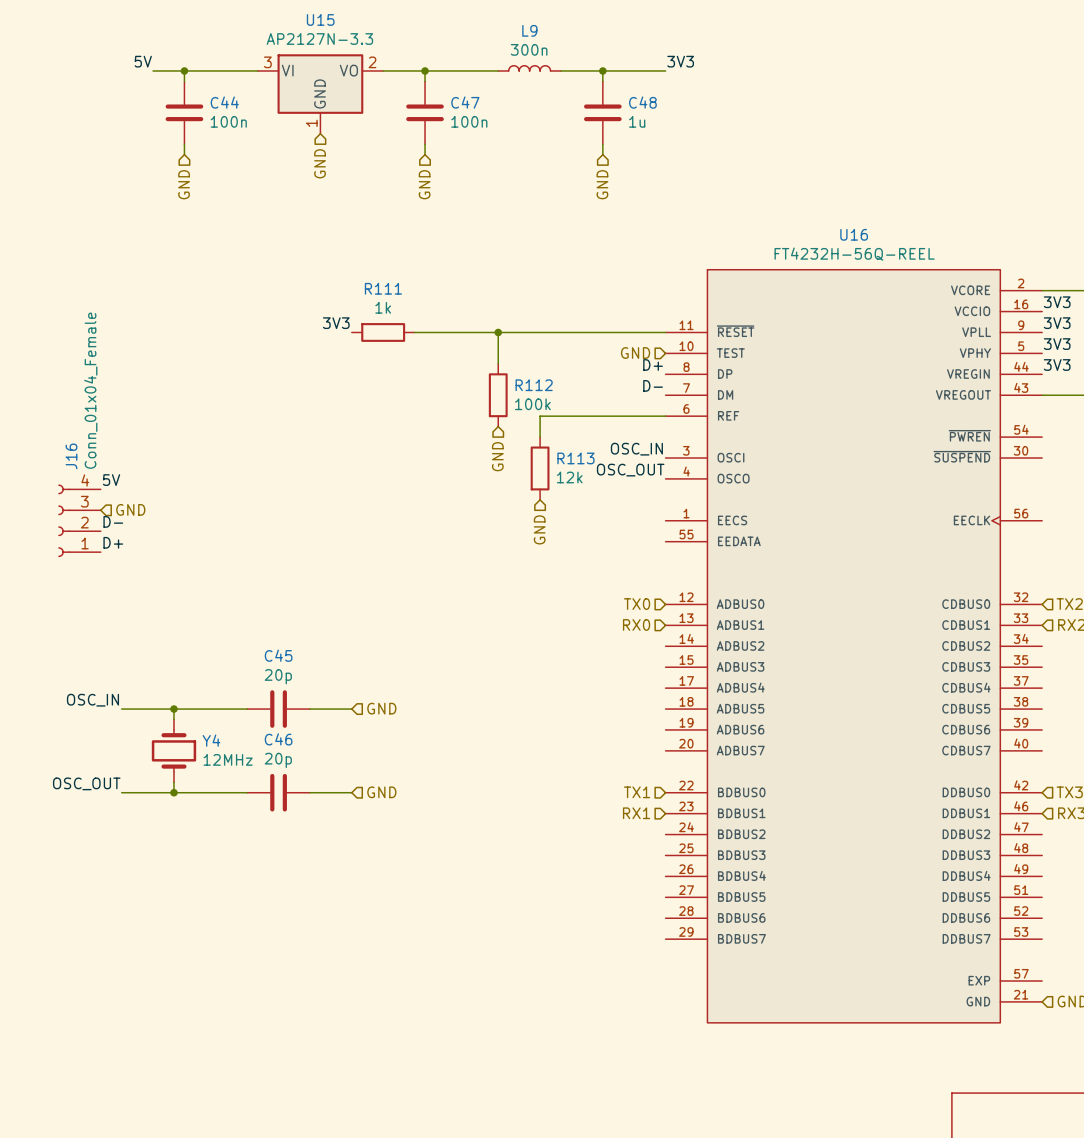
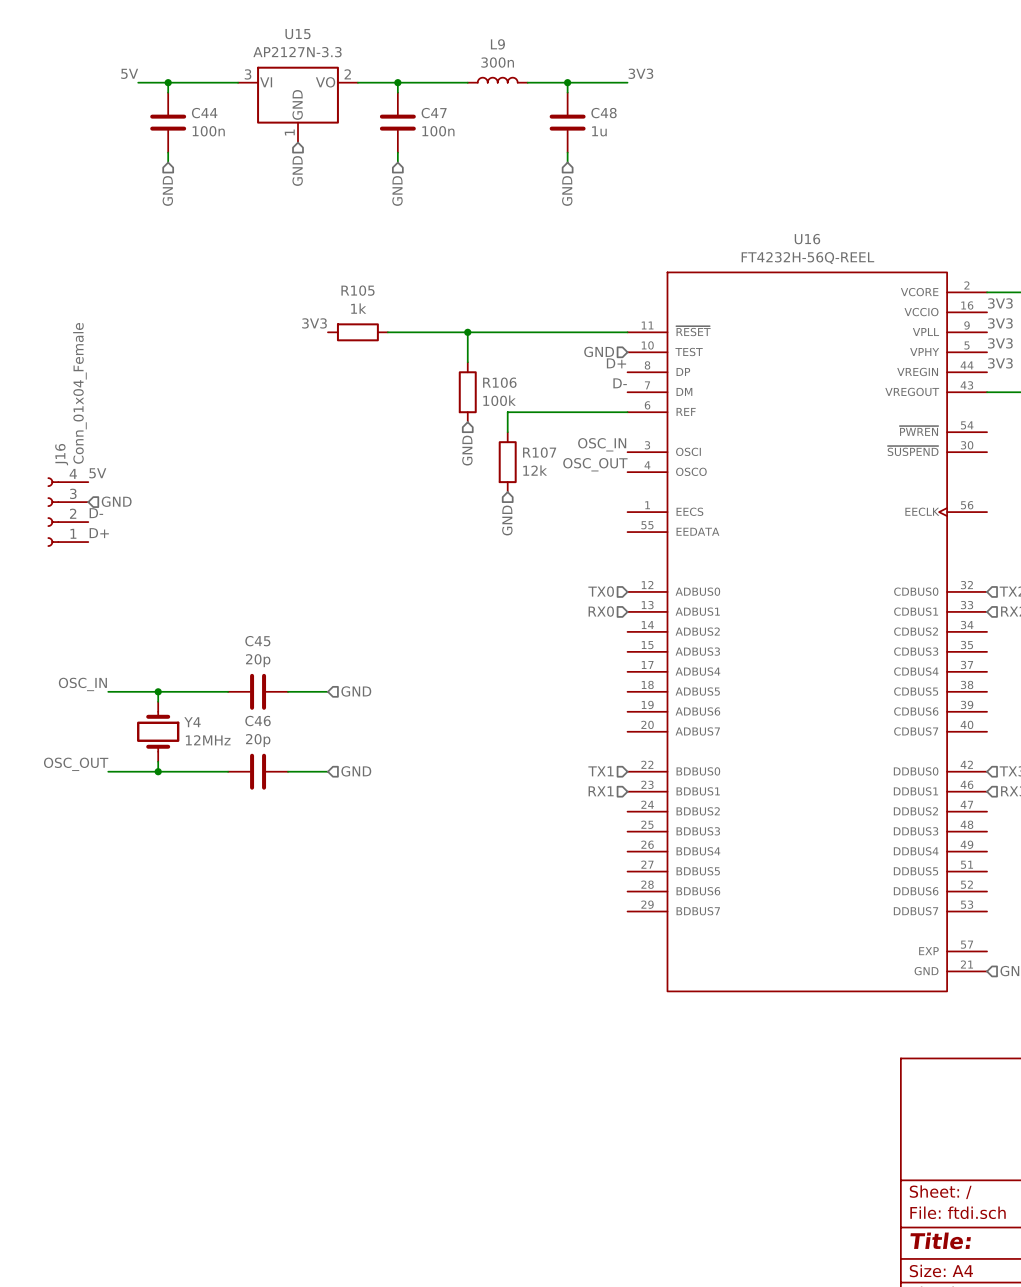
R111 name: R111 (383, 288) -> R105 (357, 290)
R112 name: R112 (534, 385) -> R106 (499, 382)
R113 name: R113 (575, 458) -> R107 (539, 452)

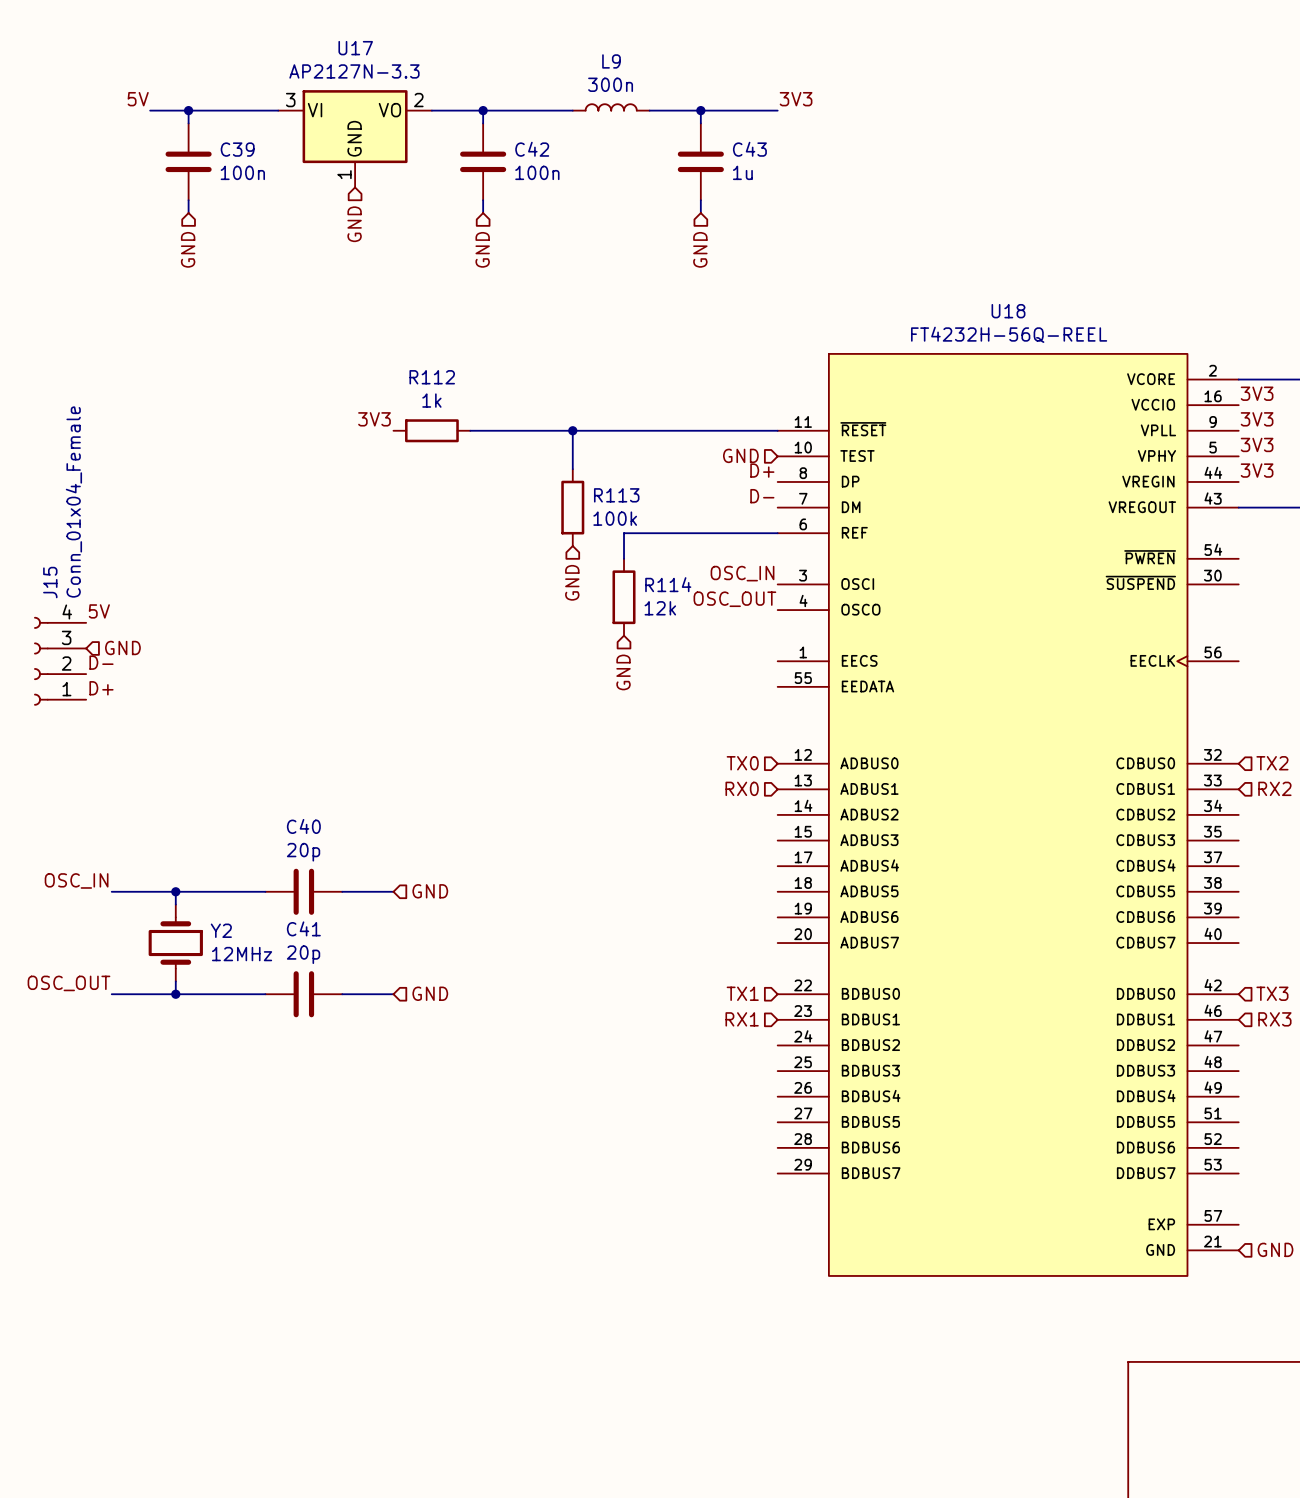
U15 name: U15 (298, 34) -> U17 (355, 48)
C44 name: C44 (204, 113) -> C39 (237, 149)
C47 name: C47 (434, 113) -> C42 (532, 149)
C48 name: C48 (604, 113) -> C43 (749, 149)
U16 name: U16 (807, 239) -> U18 (1008, 311)
R105 name: R105 (357, 290) -> R112 (432, 377)
R106 name: R106 (499, 382) -> R113 (616, 495)
R107 name: R107 (539, 452) -> R114 (668, 584)
J16 name: J16 (61, 454) -> J15 (50, 582)
C45 name: C45 (257, 641) -> C40 (303, 826)
C46 name: C46 (258, 721) -> C41 (303, 928)
Y4 name: Y4 (192, 722) -> Y2 (221, 930)

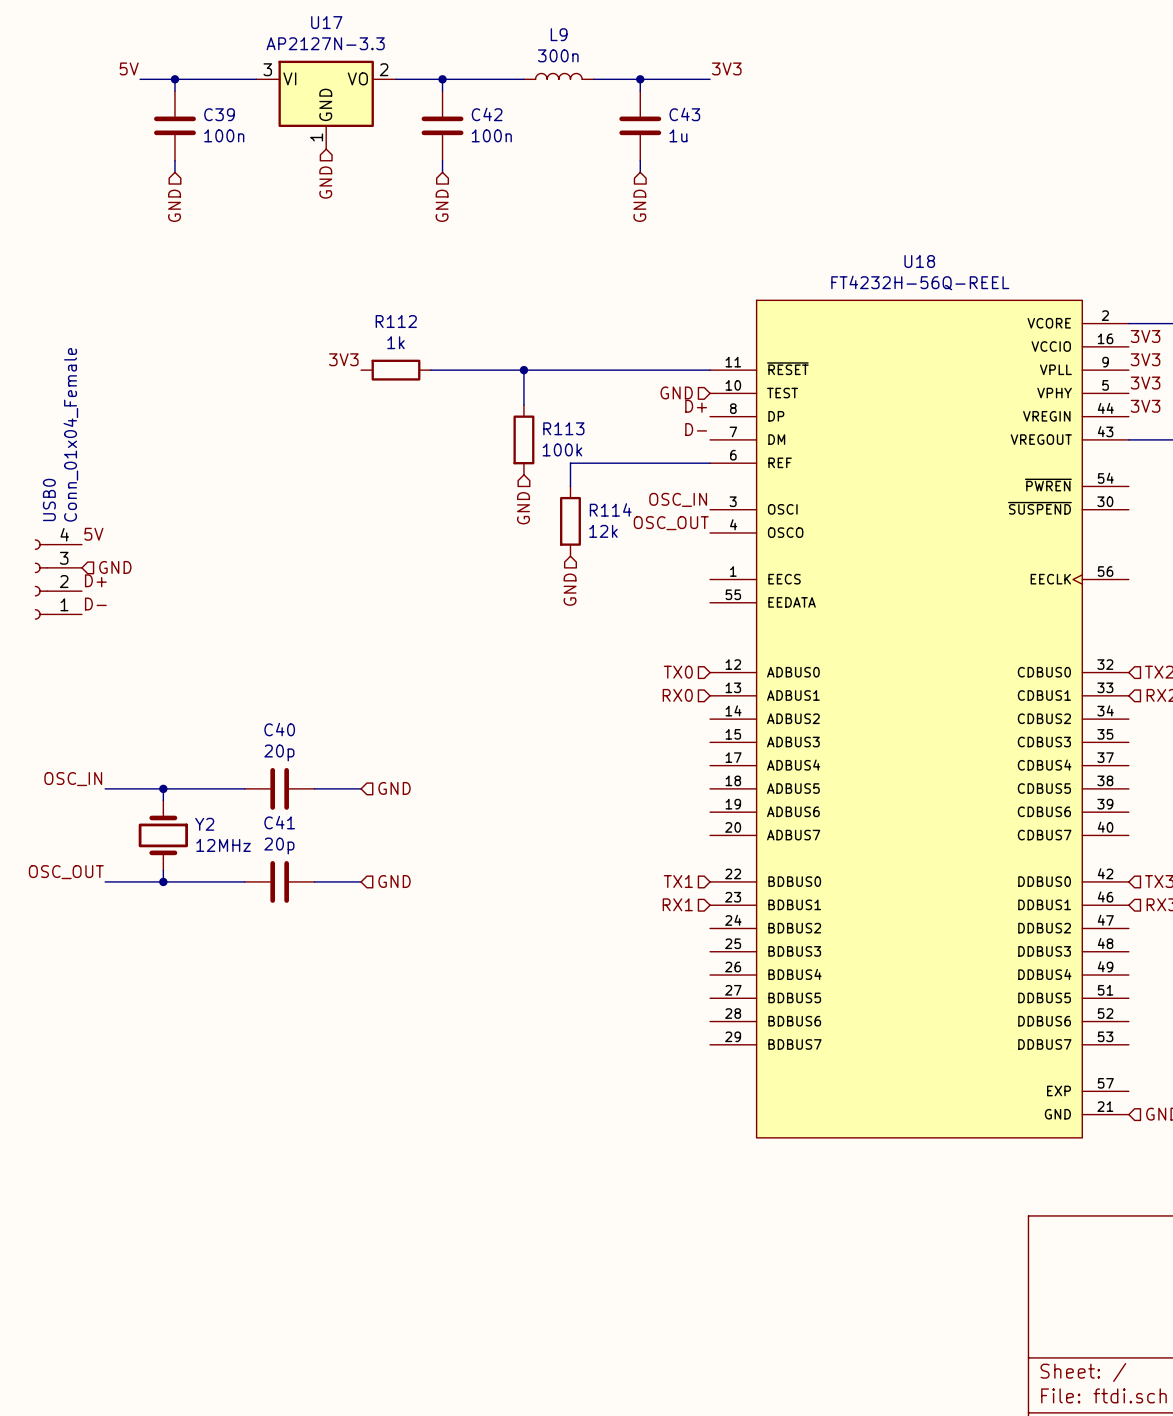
J15 name: J15 (50, 582) -> USB0 (49, 499)
label: D- (101, 662) -> D+ (95, 580)
label: D+ (101, 688) -> D- (95, 604)

